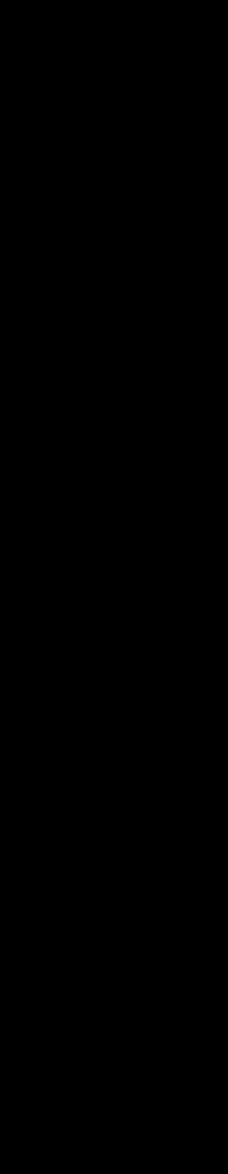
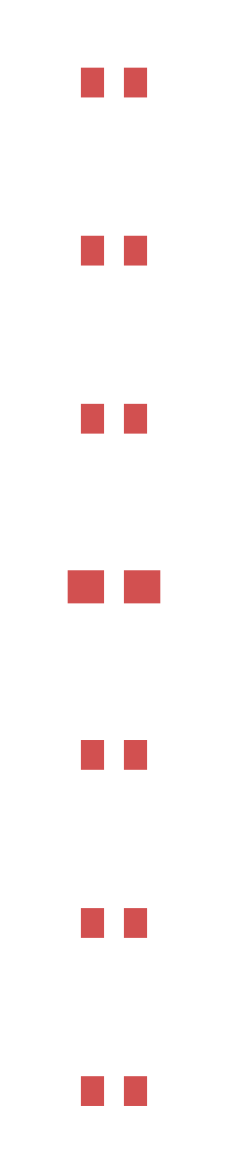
part: none -> (113, 82)
part: none -> (113, 250)
part: none -> (113, 418)
part: none -> (113, 586)
part: none -> (113, 754)
part: none -> (113, 922)
part: none -> (113, 1091)

